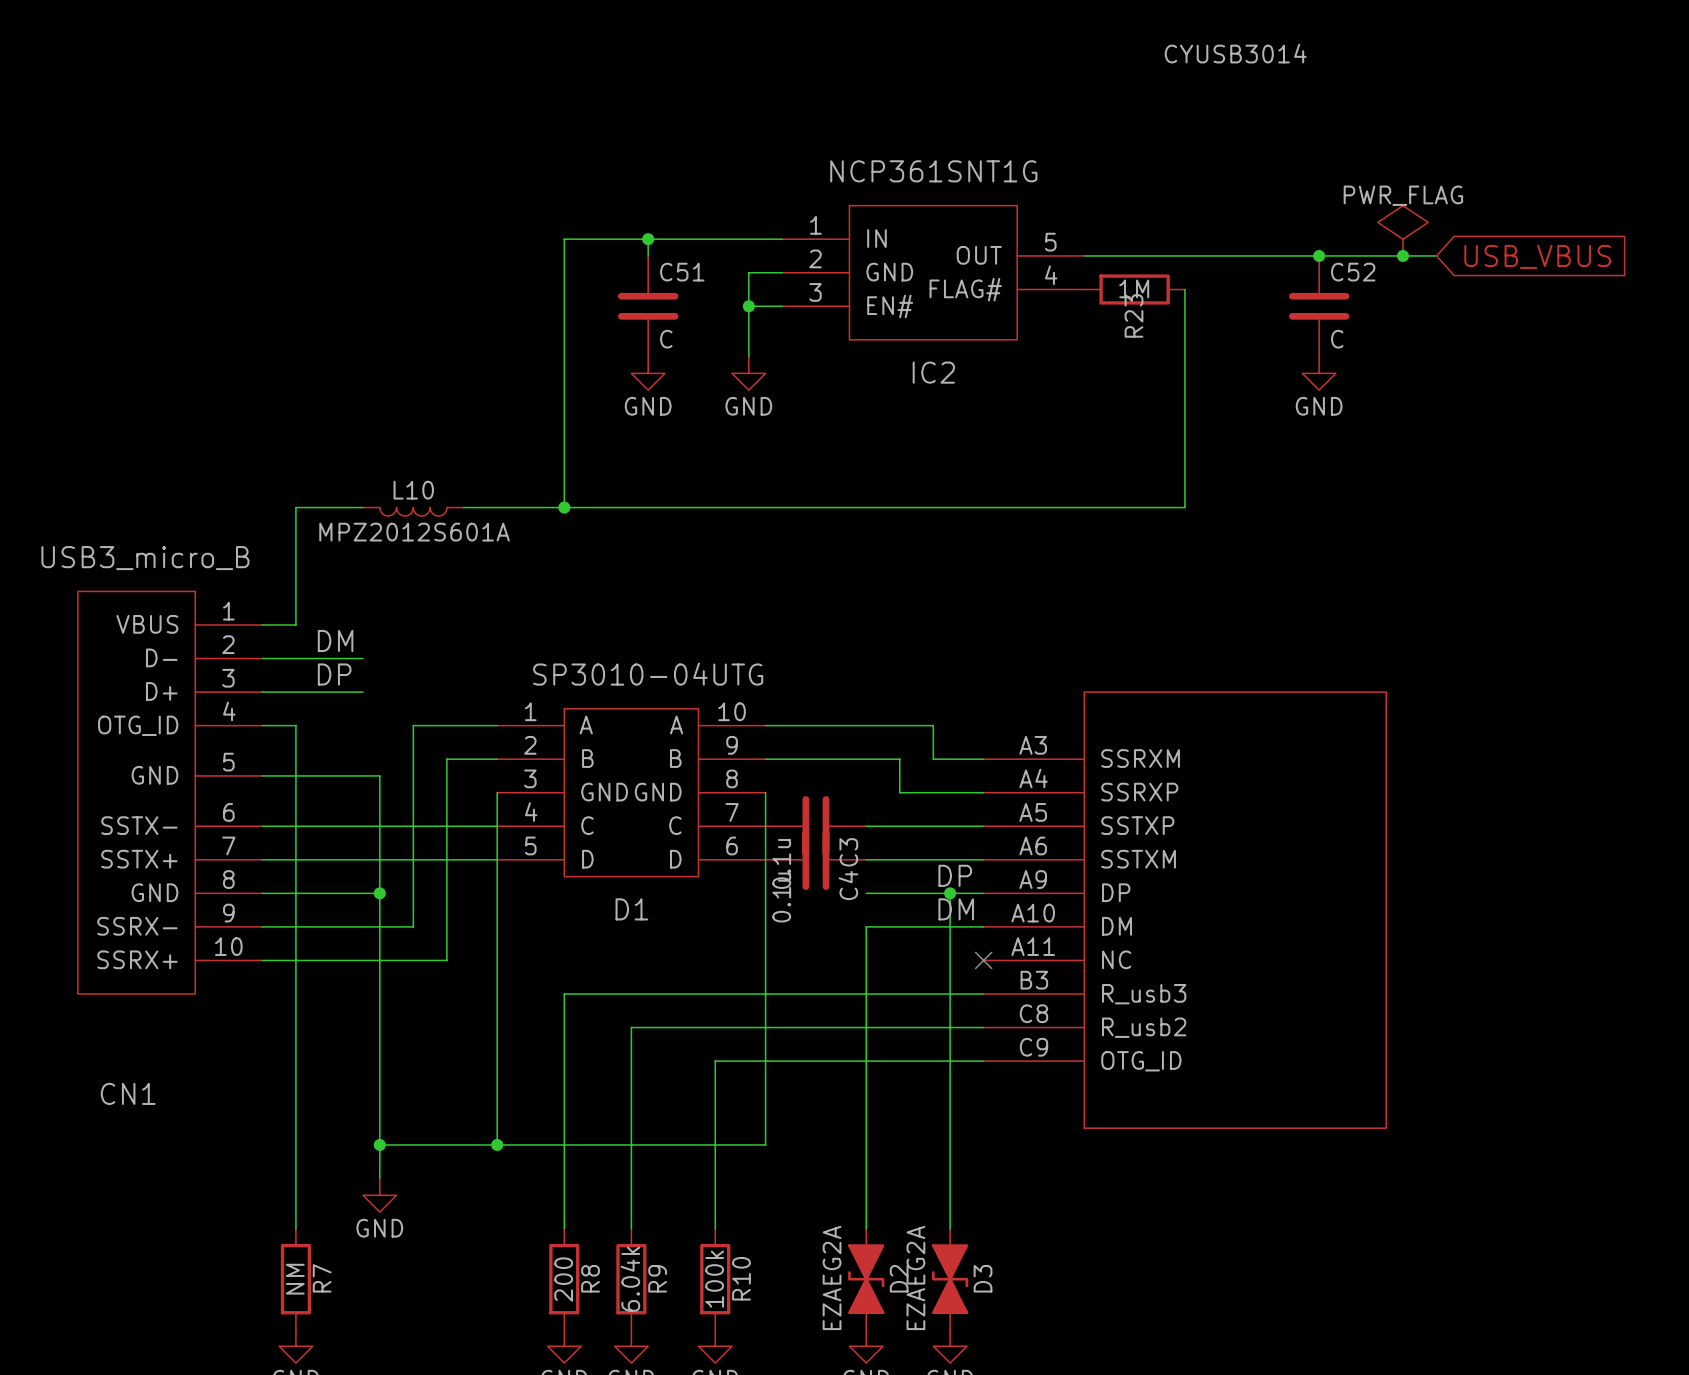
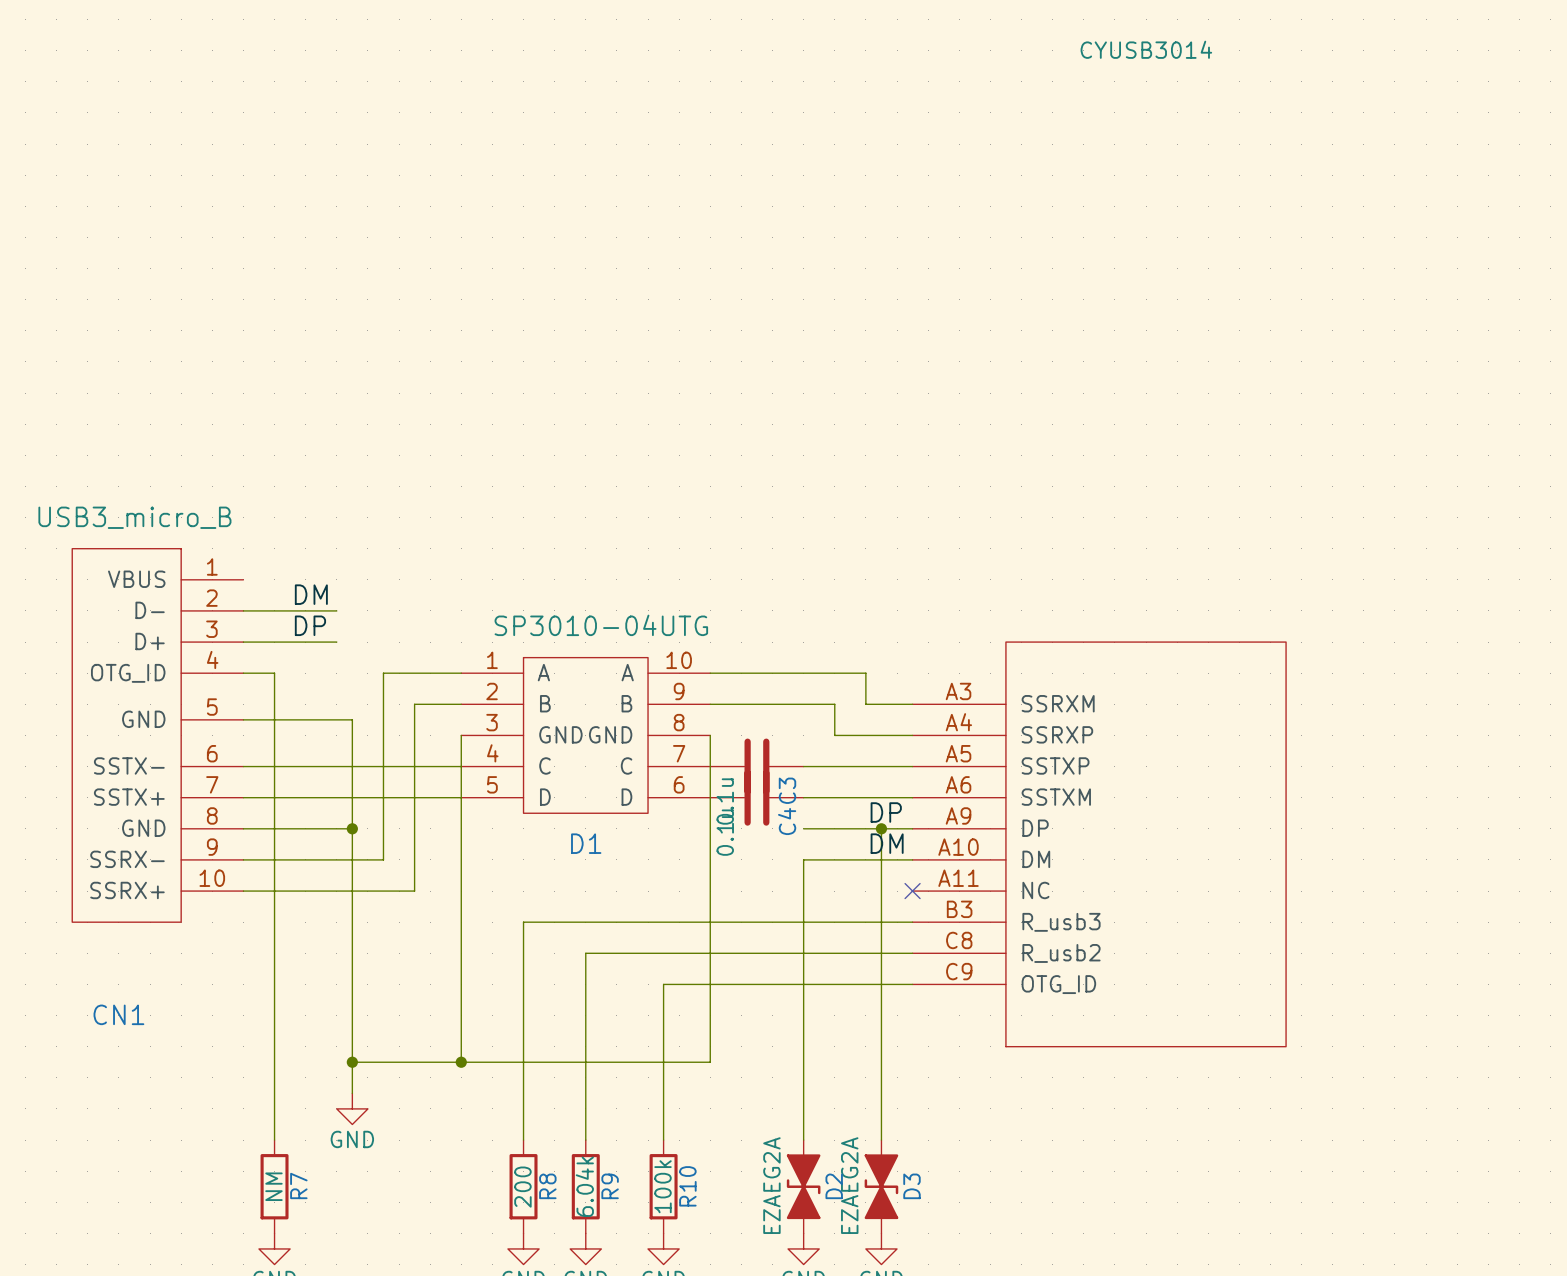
power symbol: PWR_FLAG (1403, 230) -> none
wire: (648, 239) (648, 255) -> none
junction: (648, 239) -> none
wire: (782, 239) (564, 239) (564, 507) -> none
wire: (1084, 255) (1436, 255) -> none
junction: (1319, 255) -> none
junction: (1403, 255) -> none
global label: USB_VBUS (1537, 256) -> none
wire: (782, 272) (748, 272) (748, 356) -> none
IC2: NCP361SNT1G (933, 272) -> none
R23: 1M (1134, 289) -> none
wire: (1184, 289) (1184, 507) (463, 507) -> none
C51: C (648, 306) -> none
wire: (748, 306) (782, 306) -> none
junction: (748, 306) -> none
C52: C (1319, 306) -> none
power symbol: GND (648, 373) -> none
power symbol: GND (748, 373) -> none
power symbol: GND (1319, 373) -> none
wire: (363, 507) (295, 507) (295, 624) (262, 624) -> none
junction: (564, 507) -> none
L10: MPZ2012S601A (413, 511) -> none

